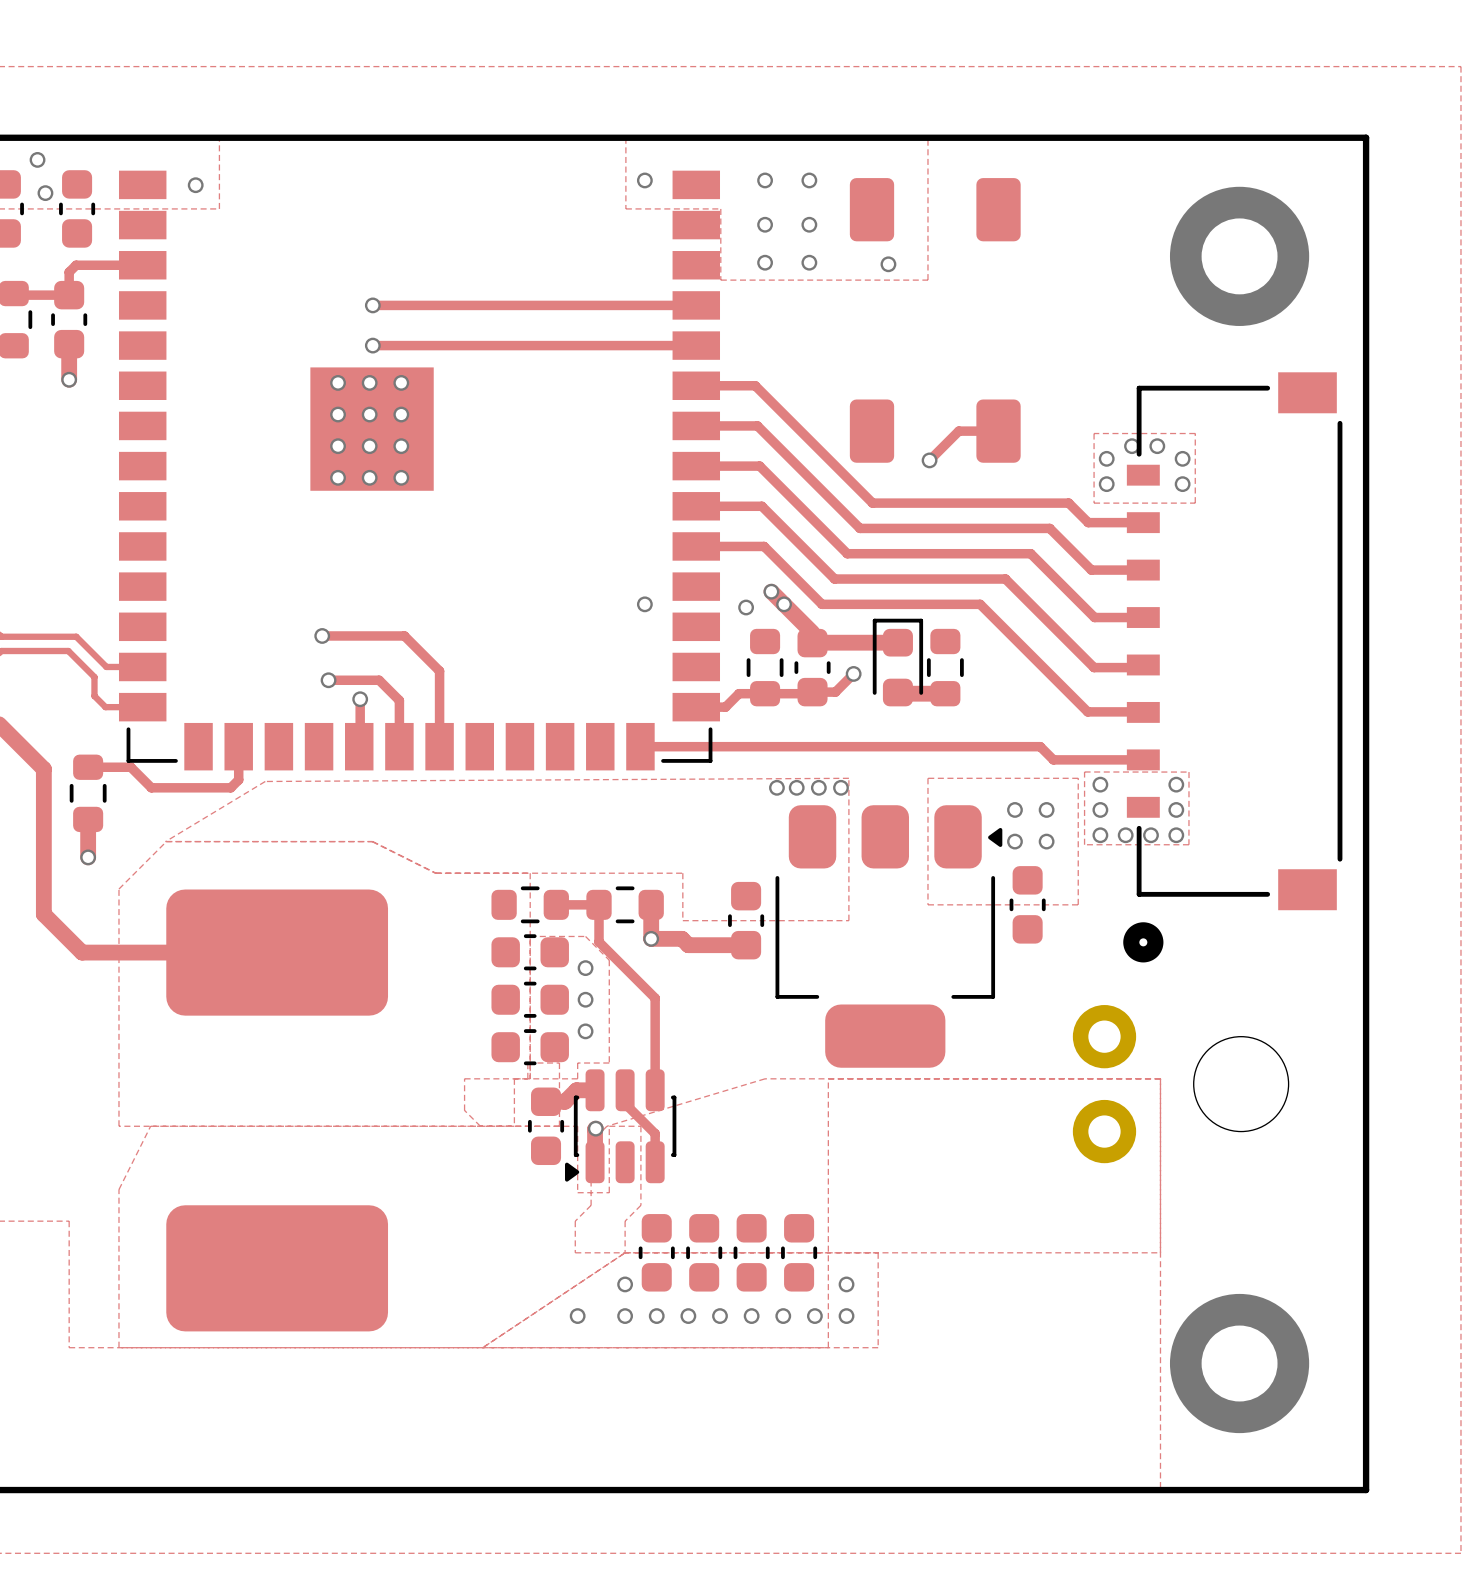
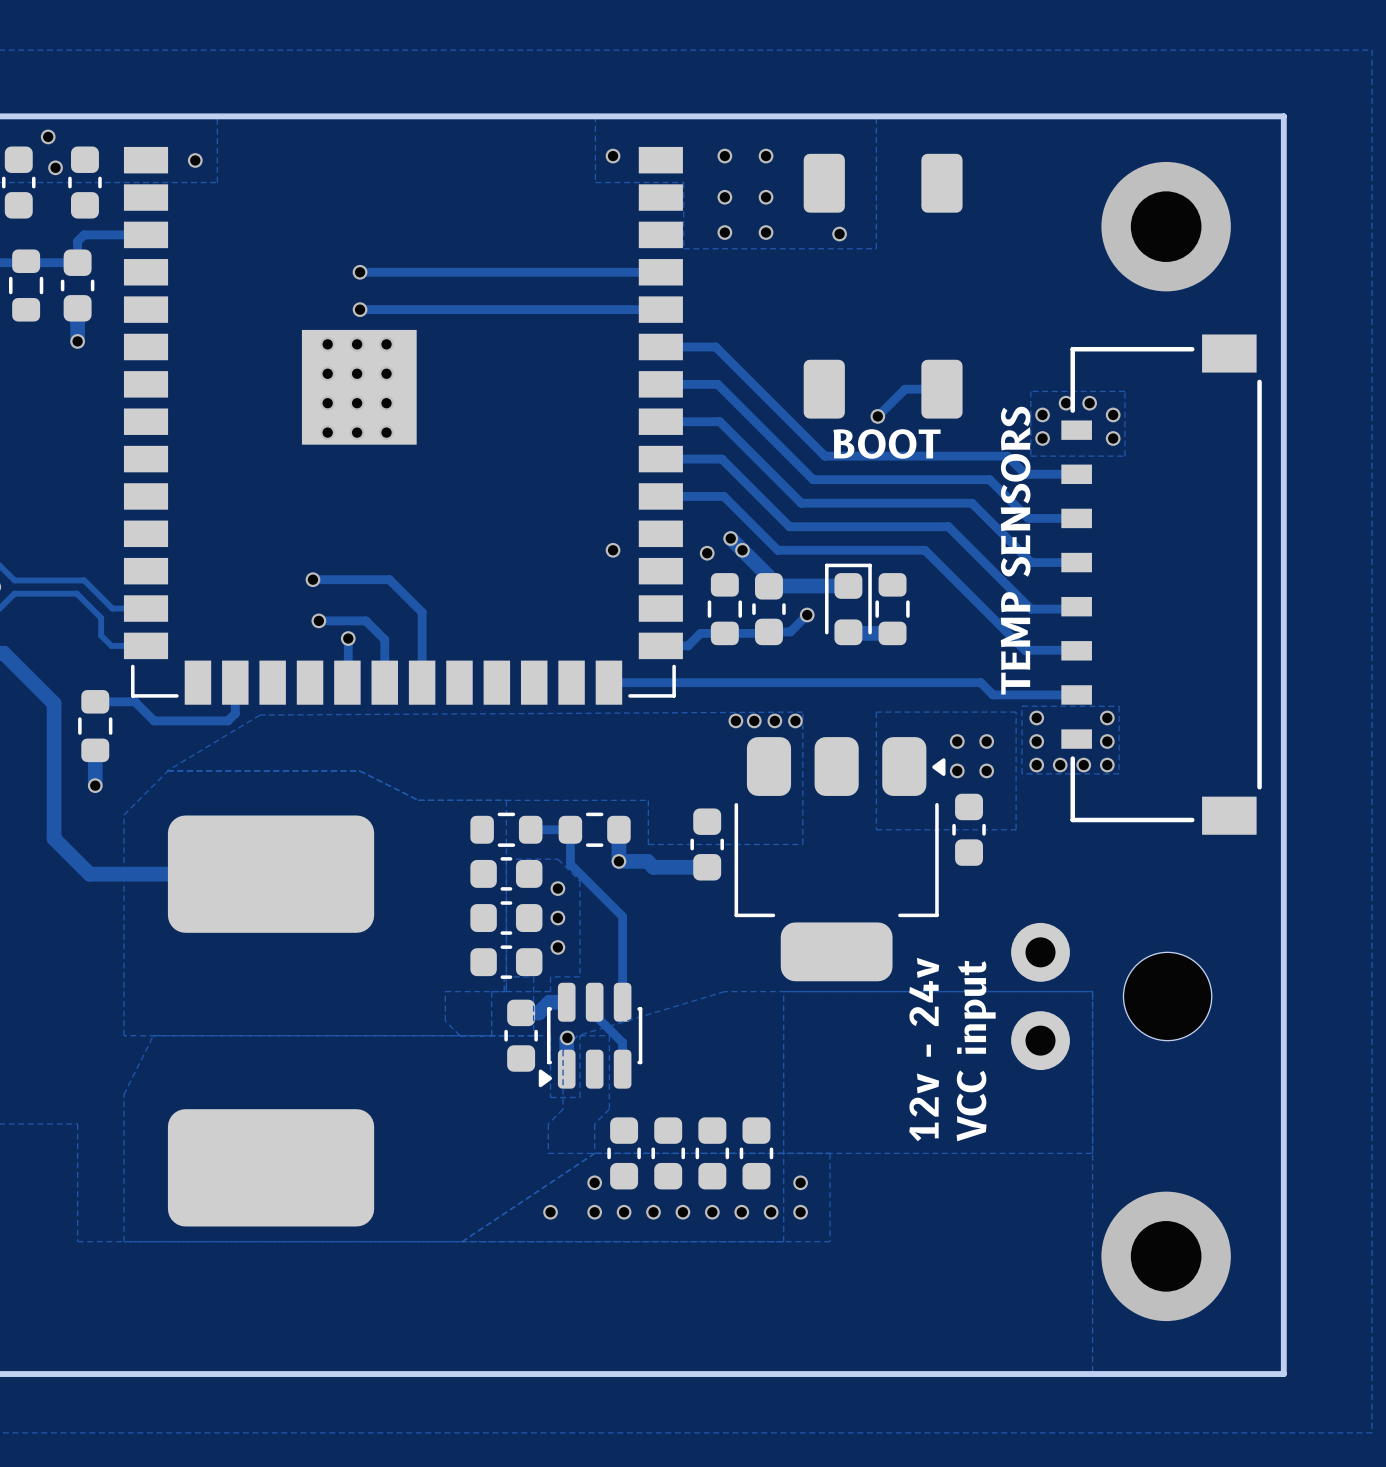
part footprint: [1123, 372, 1343, 963] -> [1061, 334, 1262, 835]
text: none -> BOOT (887, 443)
text: none -> TEMP SENSORS (1015, 550)
text: none -> 12v - 24v (924, 1049)
text: none -> VCC input (976, 1051)

